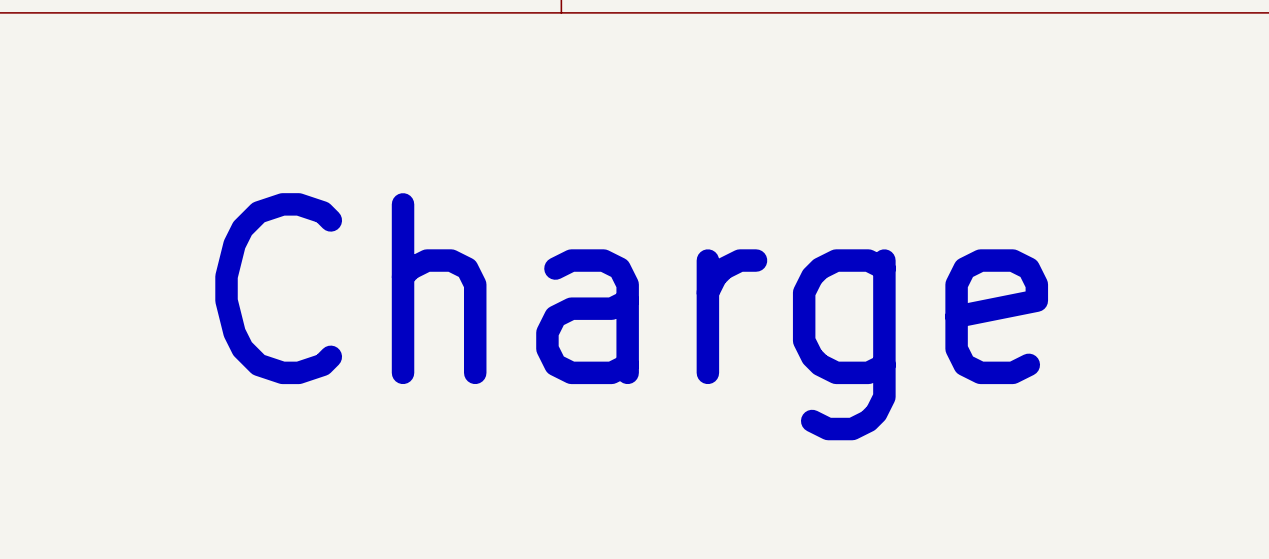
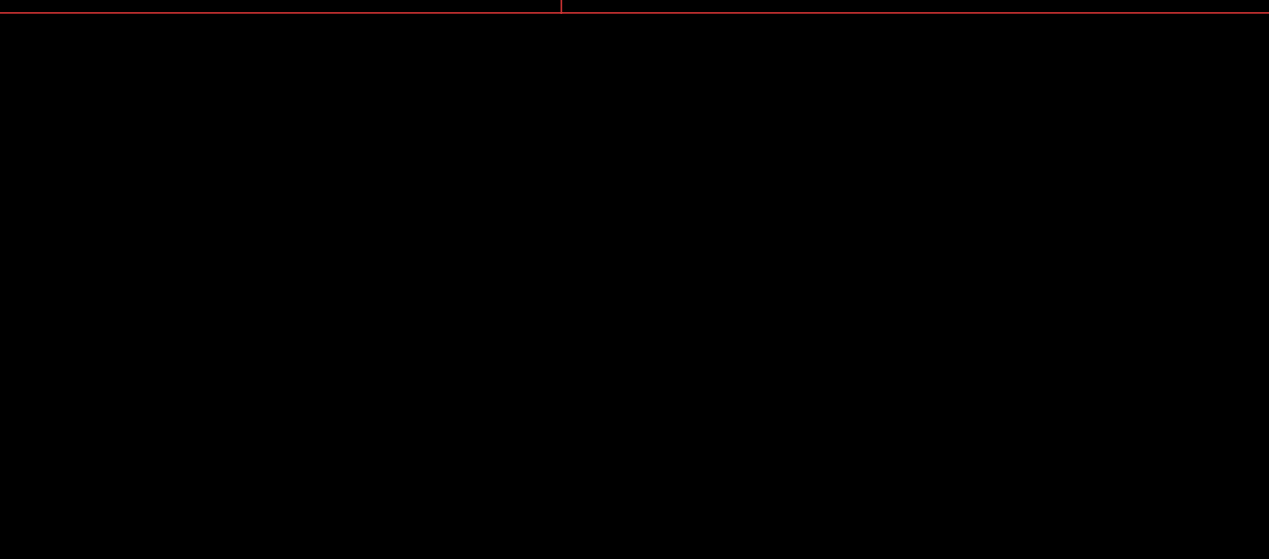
text: Charge (631, 316) -> none

